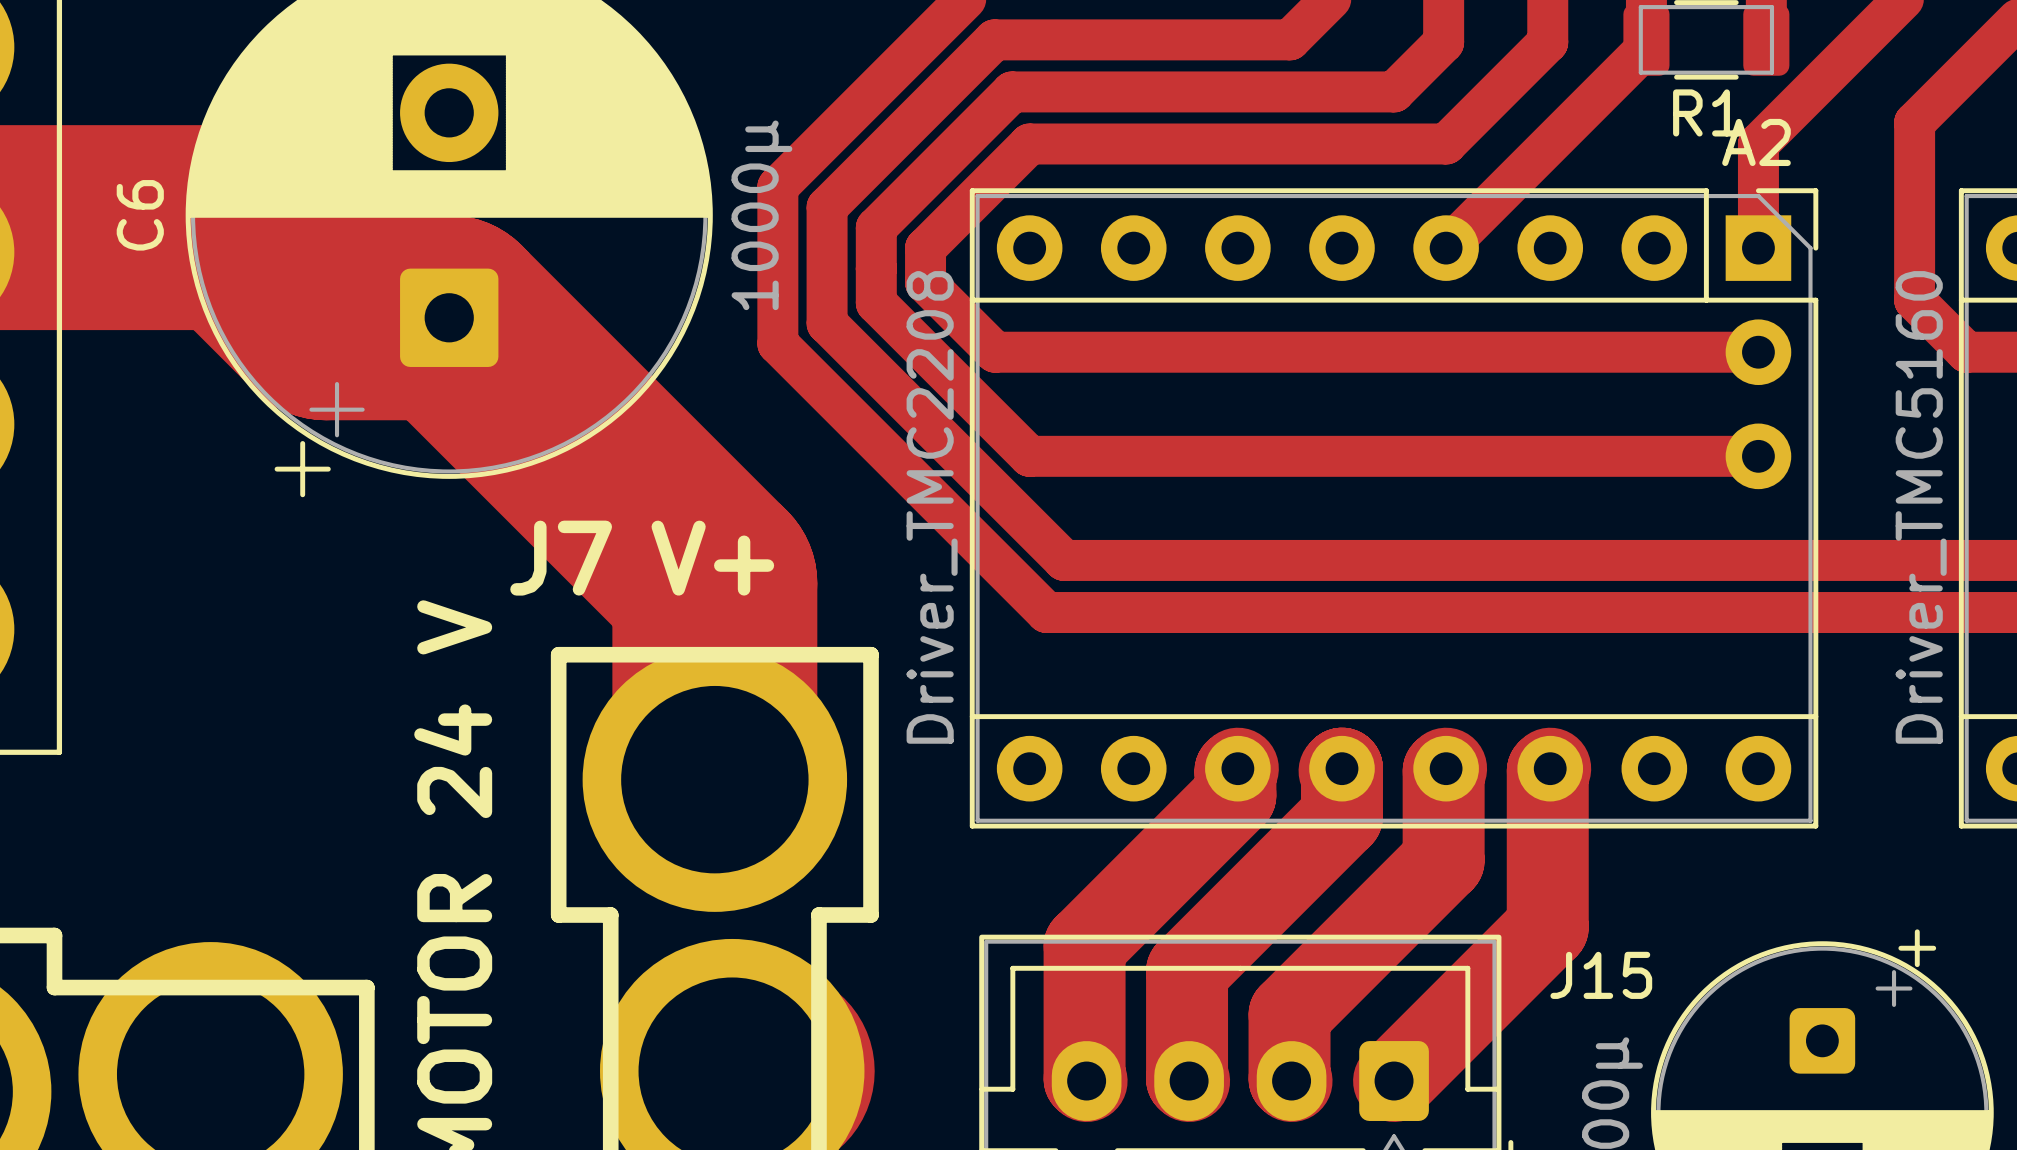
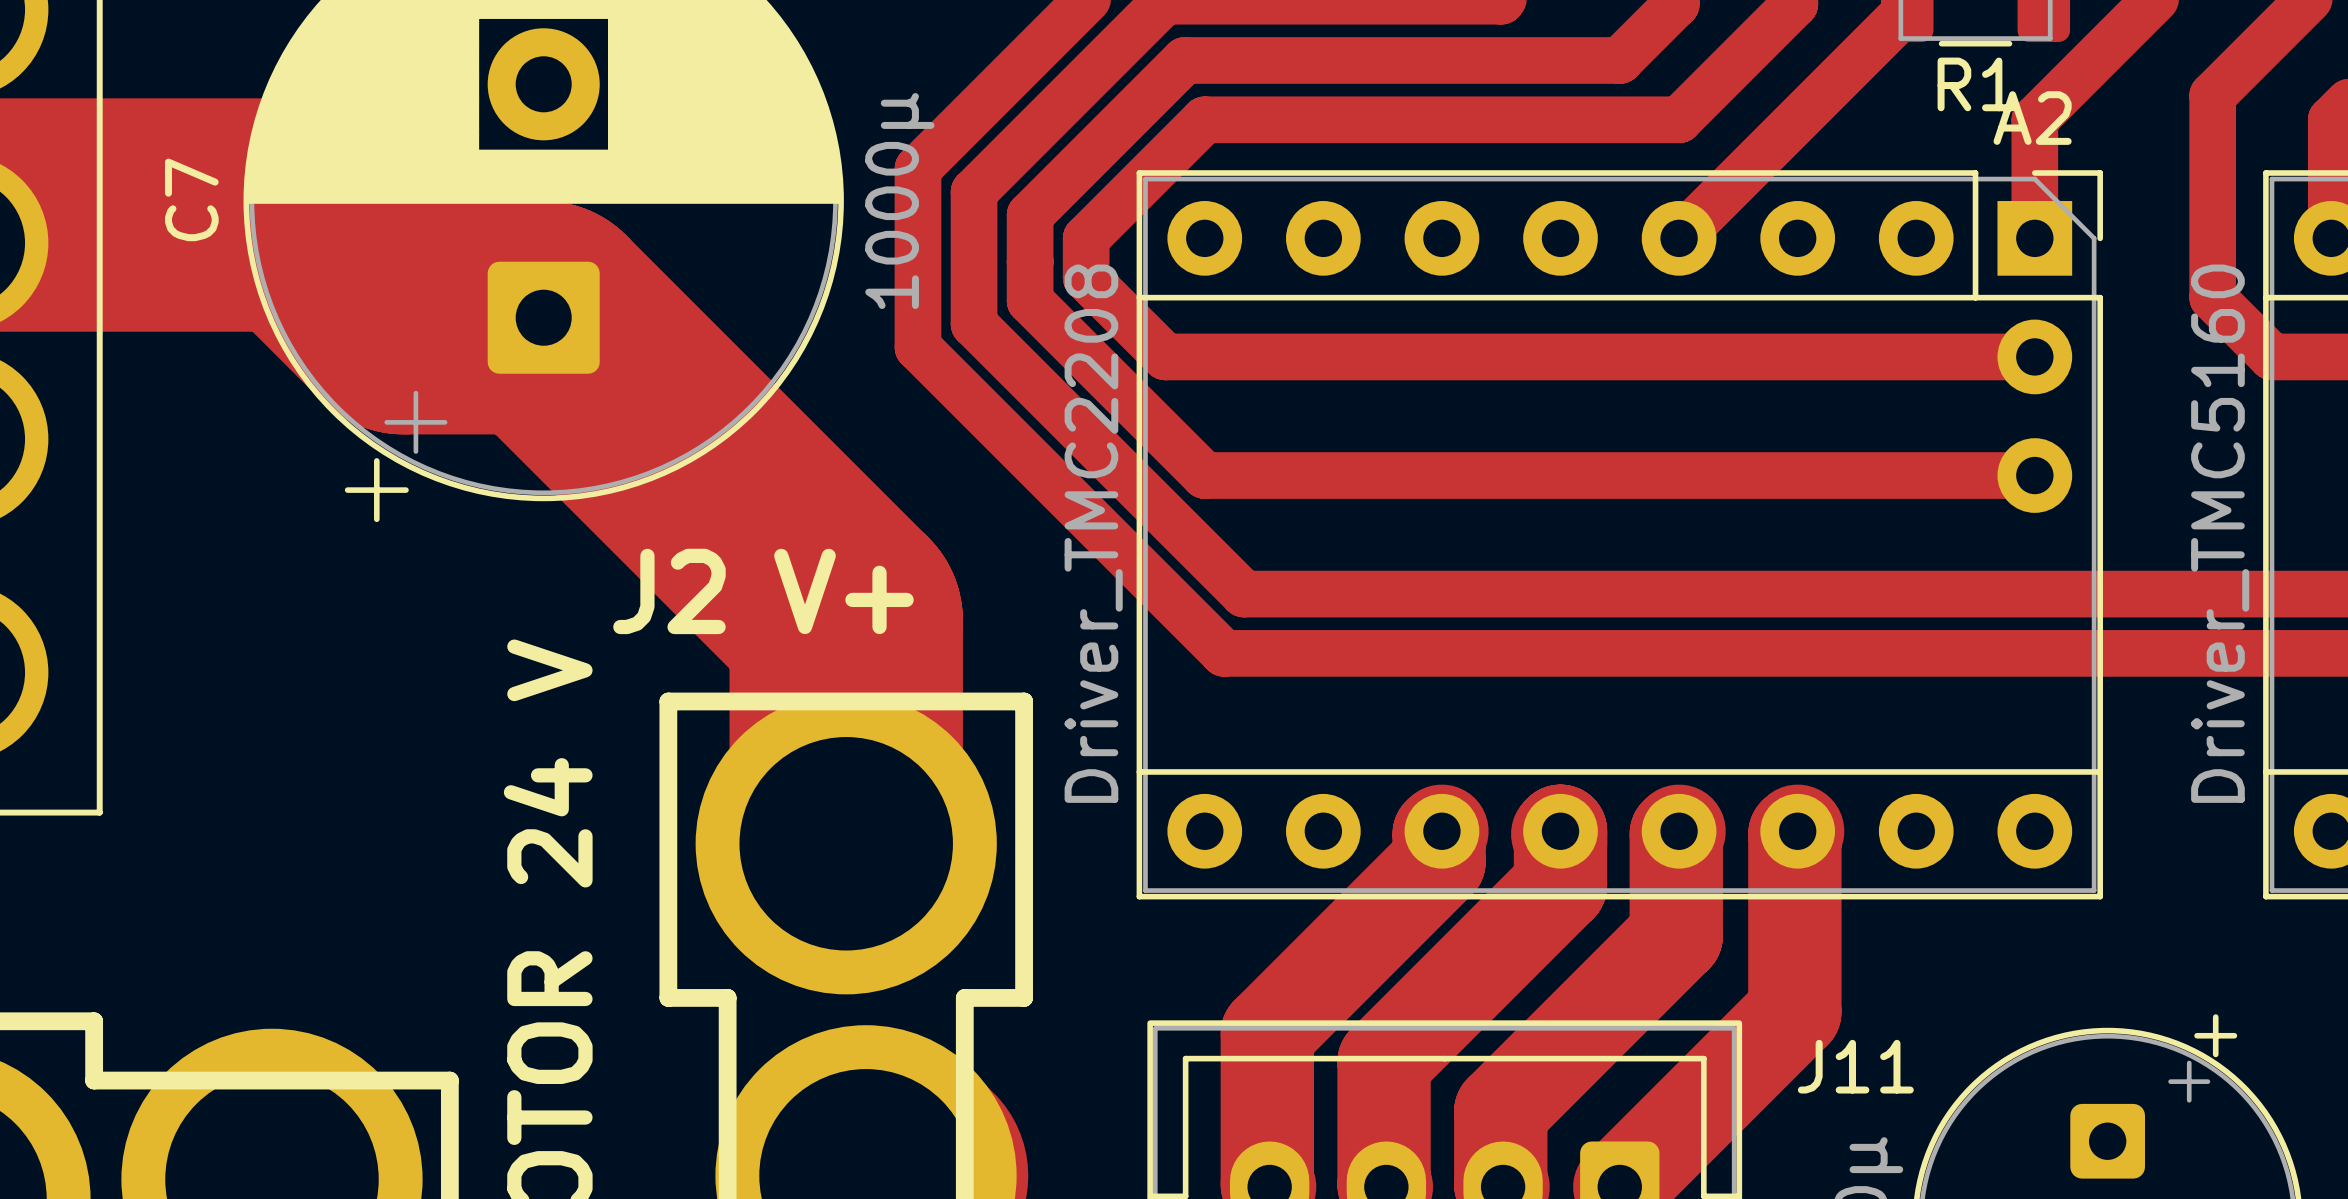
C6 name: C6 (140, 215) -> C7 (191, 199)
J7 name: J7 (561, 558) -> J2 (669, 591)
J15 name: J15 (1601, 975) -> J11 (1855, 1066)

